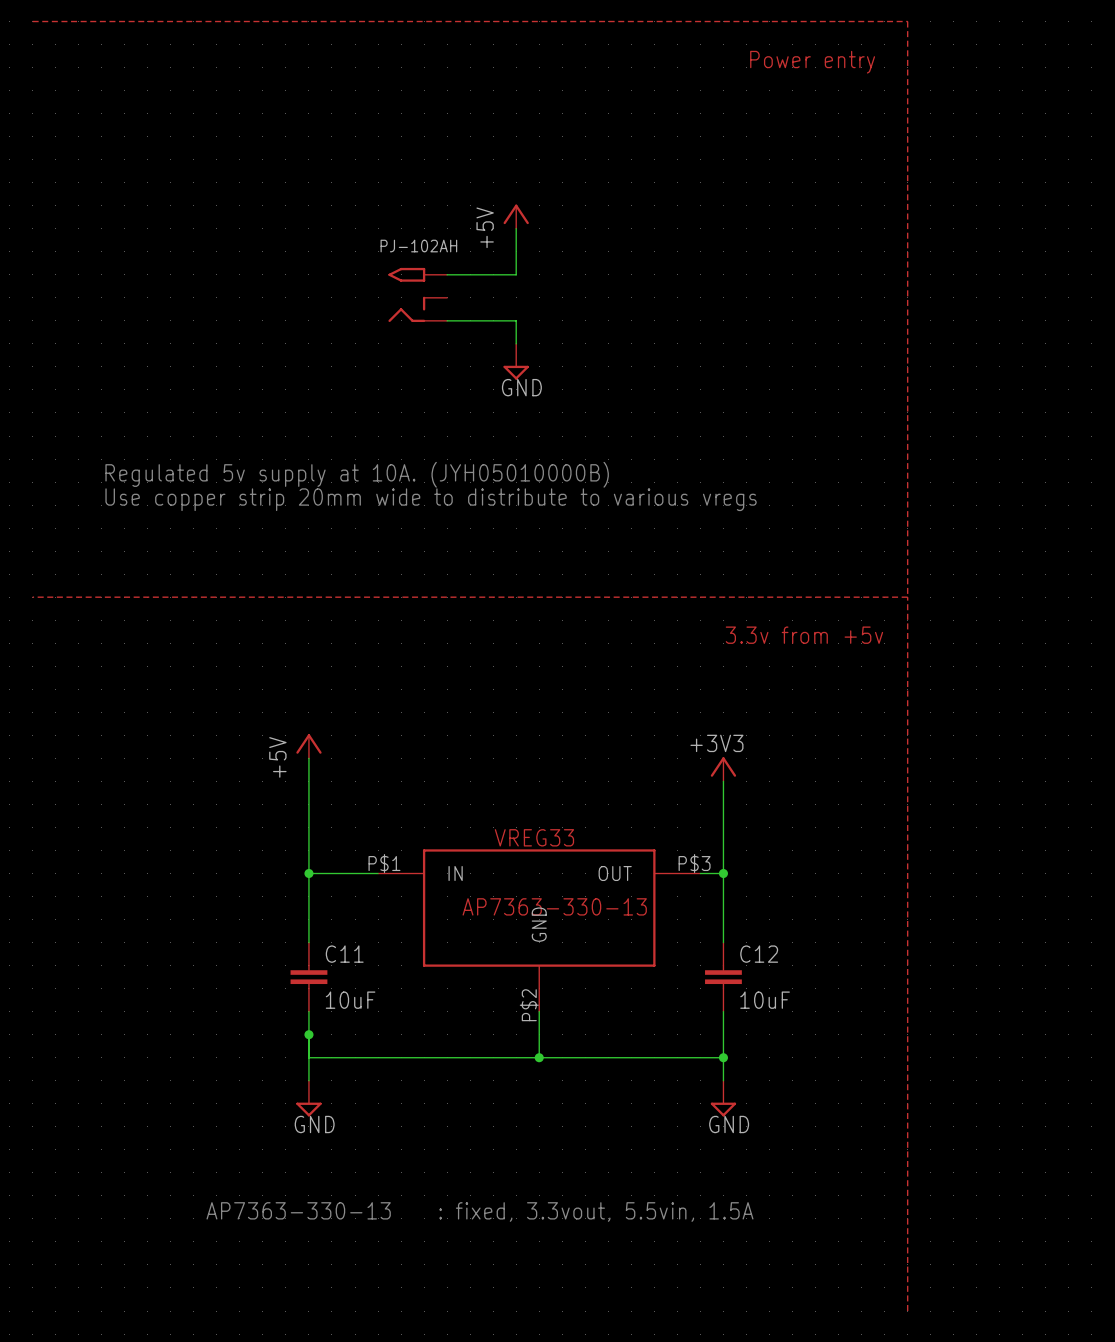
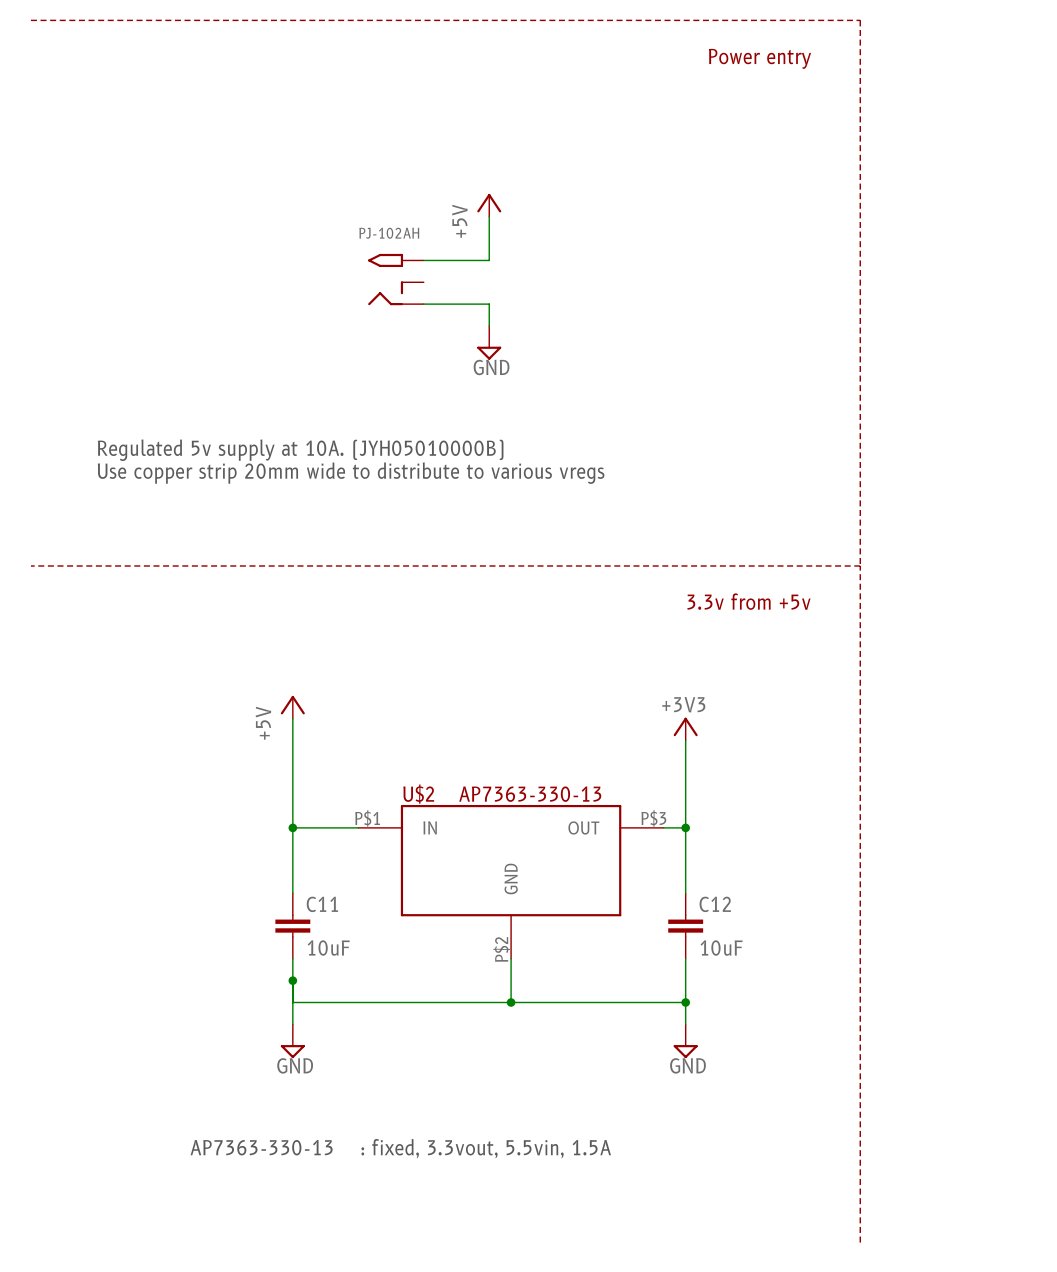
VREG33 name: VREG33 (534, 837) -> U$2 (418, 794)
VREG33 value position: AP7363-330-13 (554, 906) -> AP7363-330-13 (530, 794)

